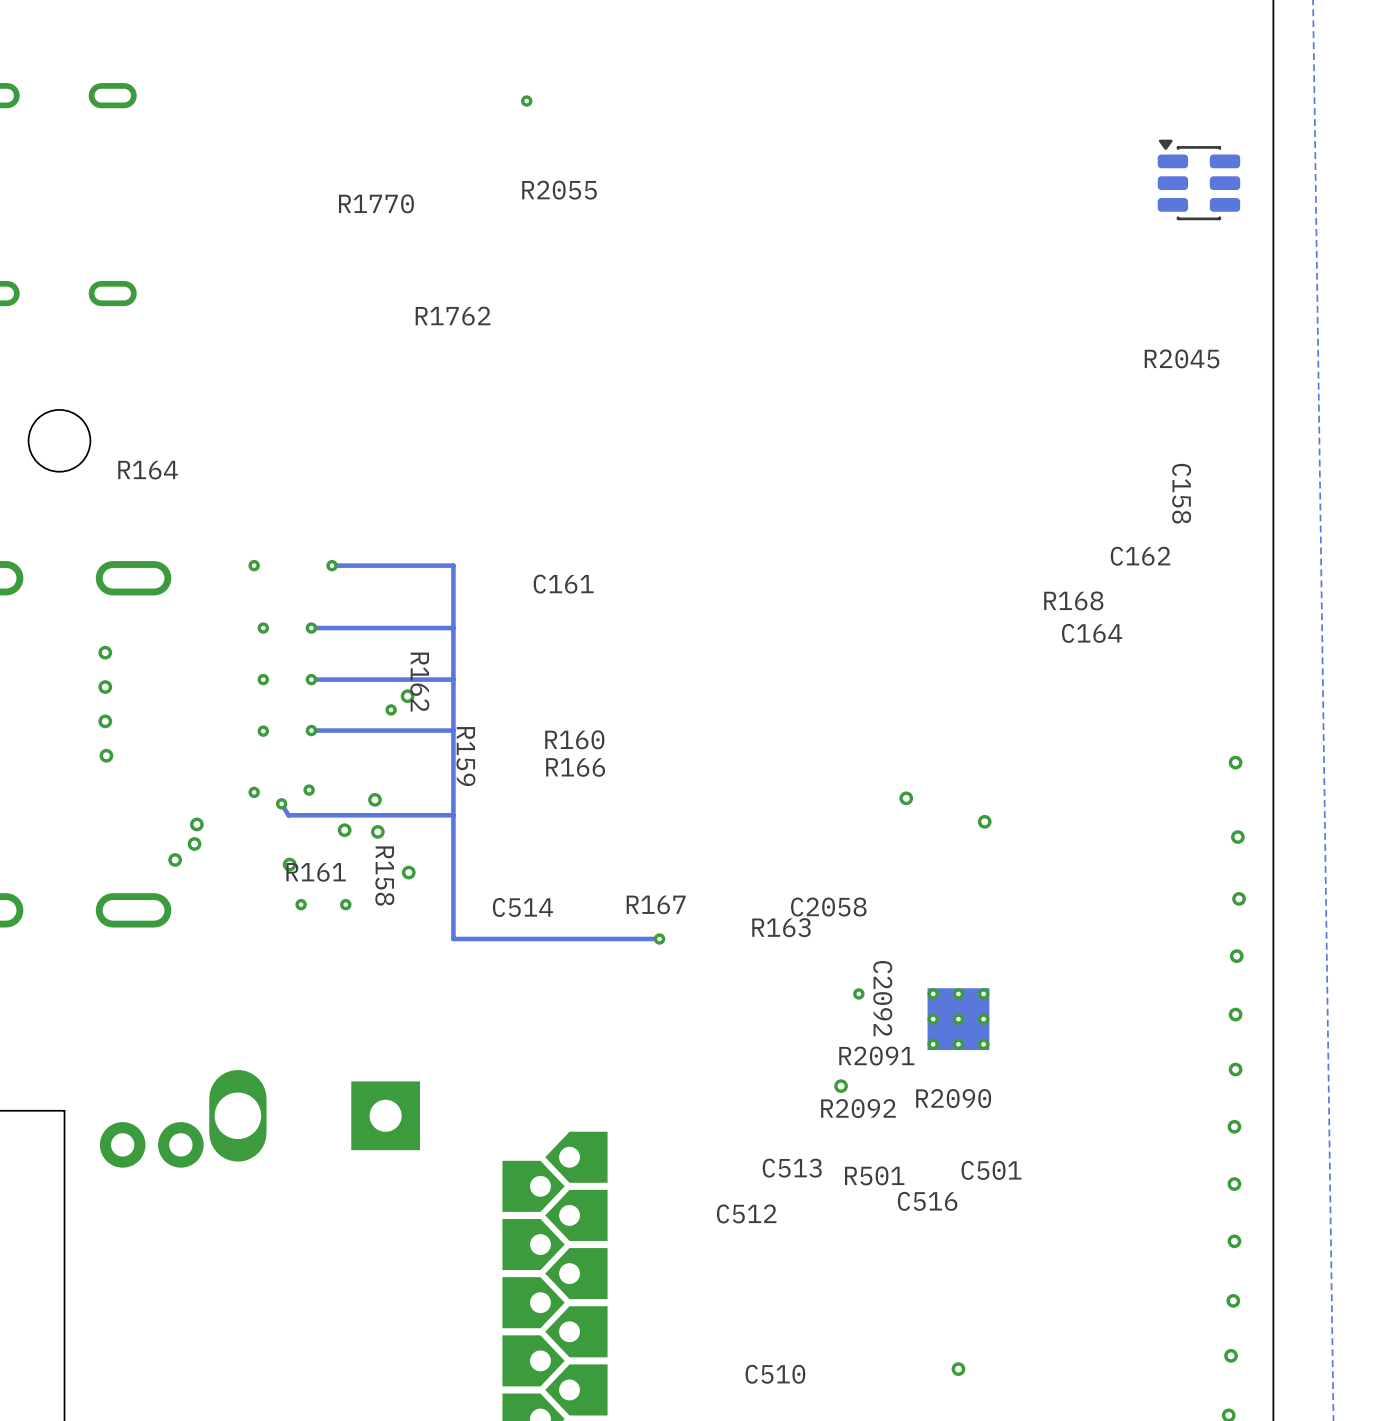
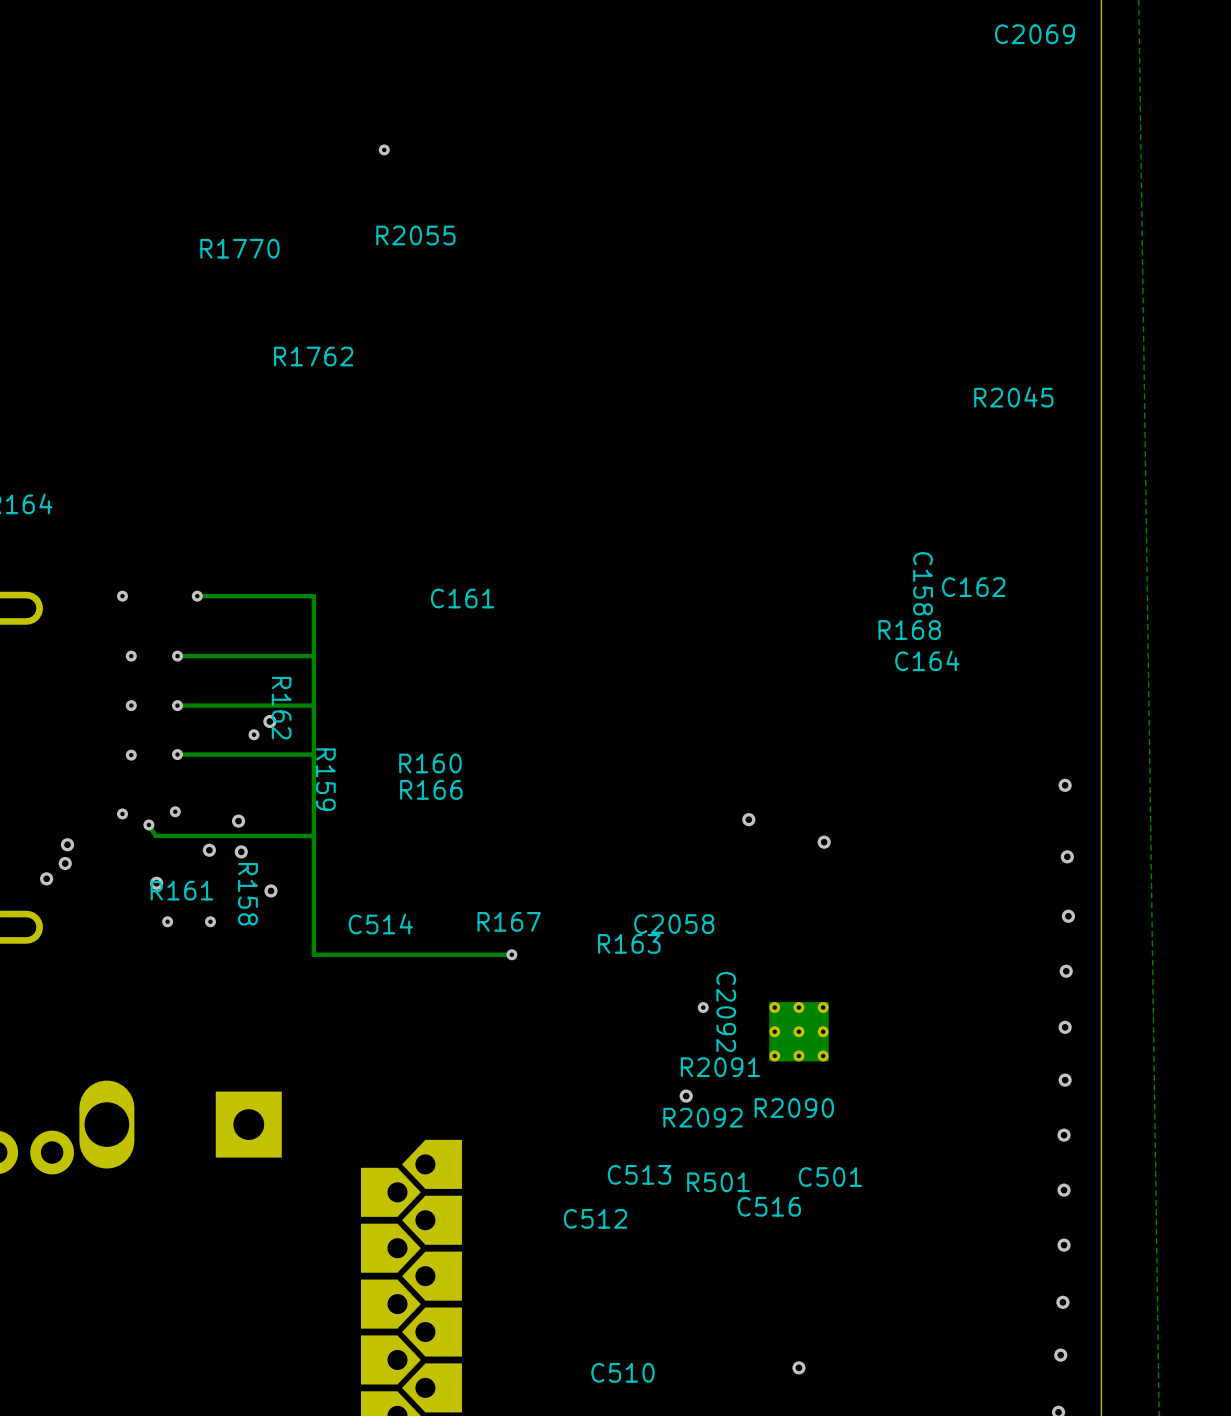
part: (1198, 179) -> none
C158 position: (1181, 493) -> (923, 583)
C161 position: (563, 584) -> (462, 598)

